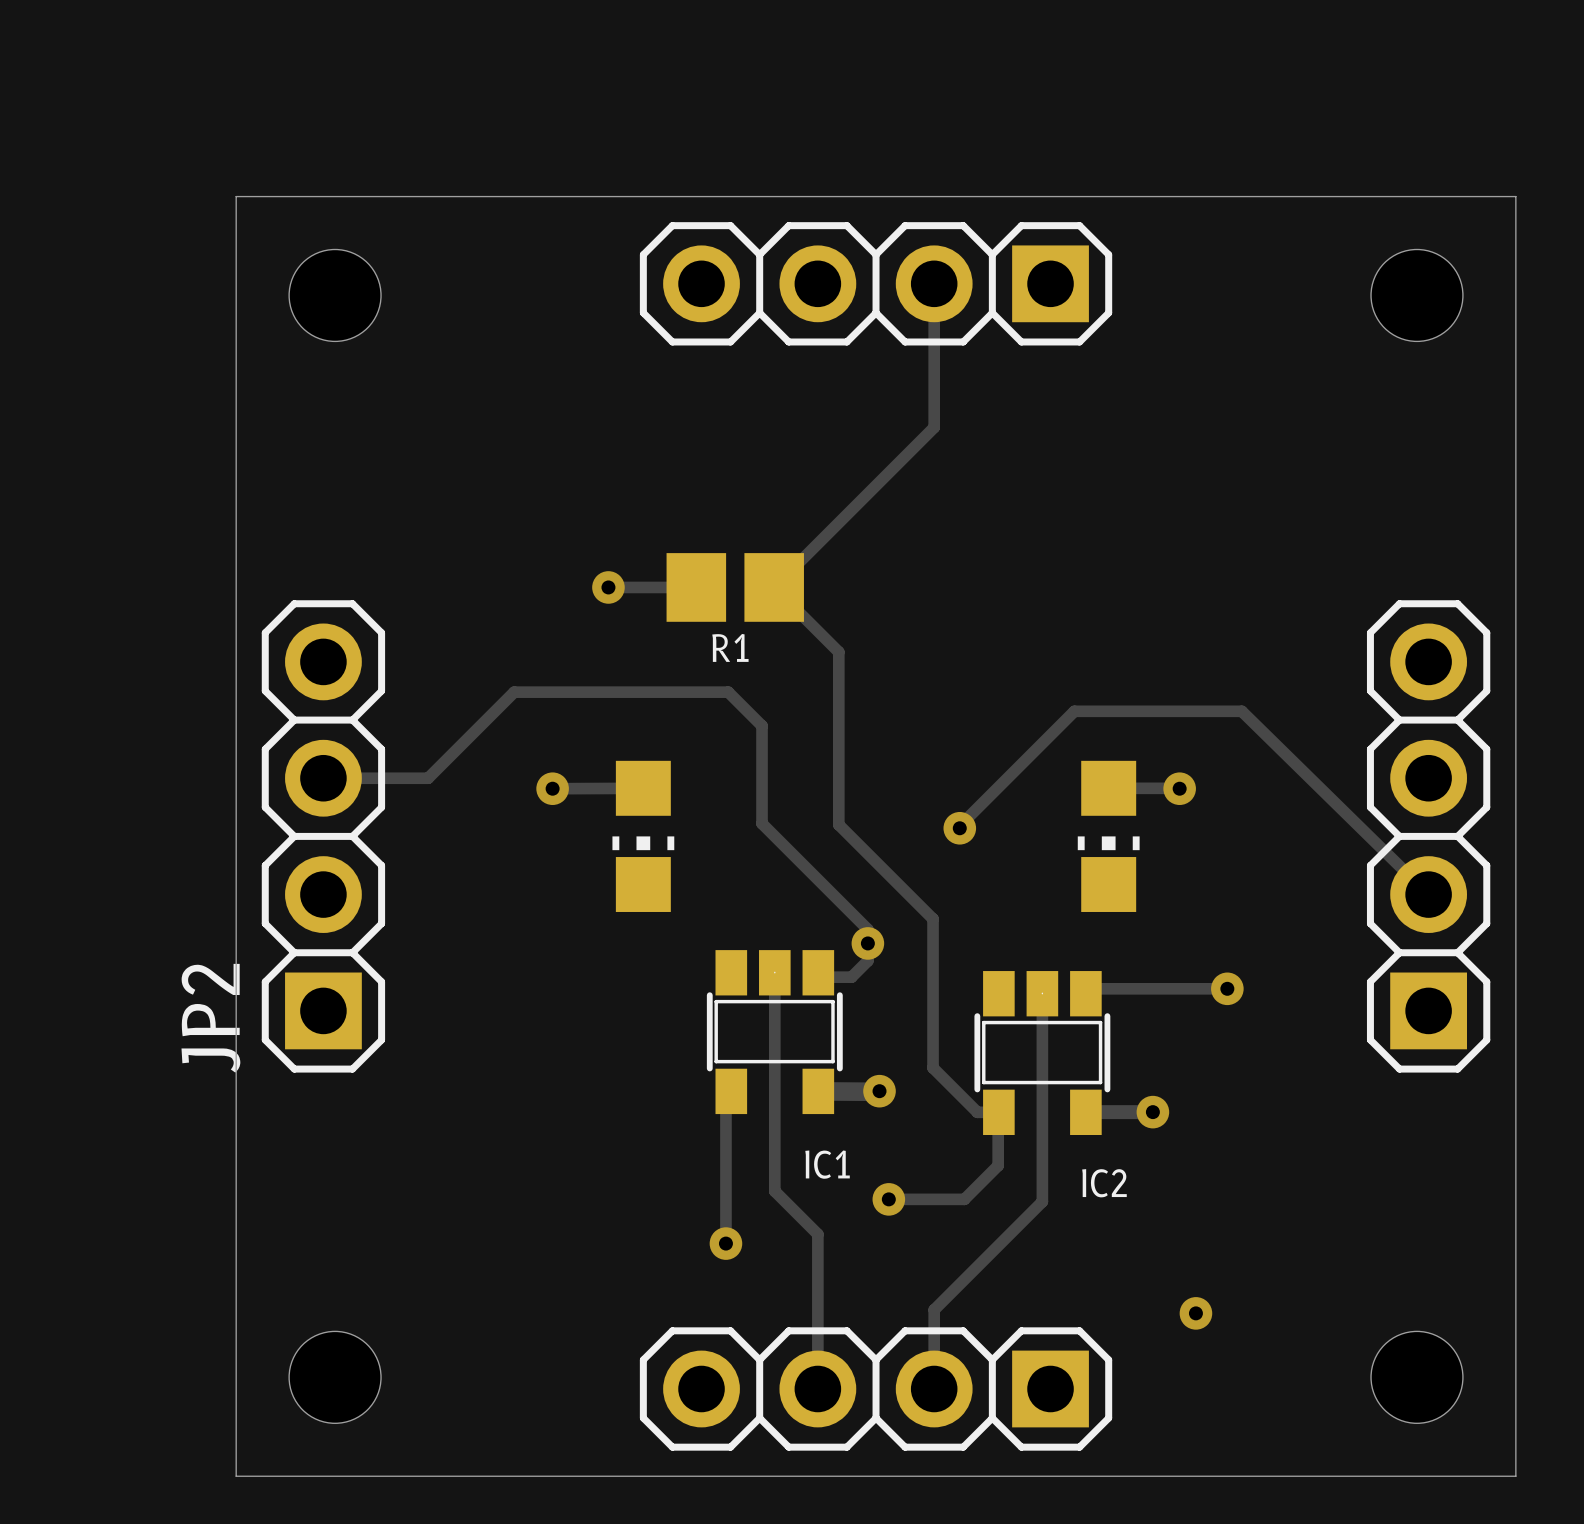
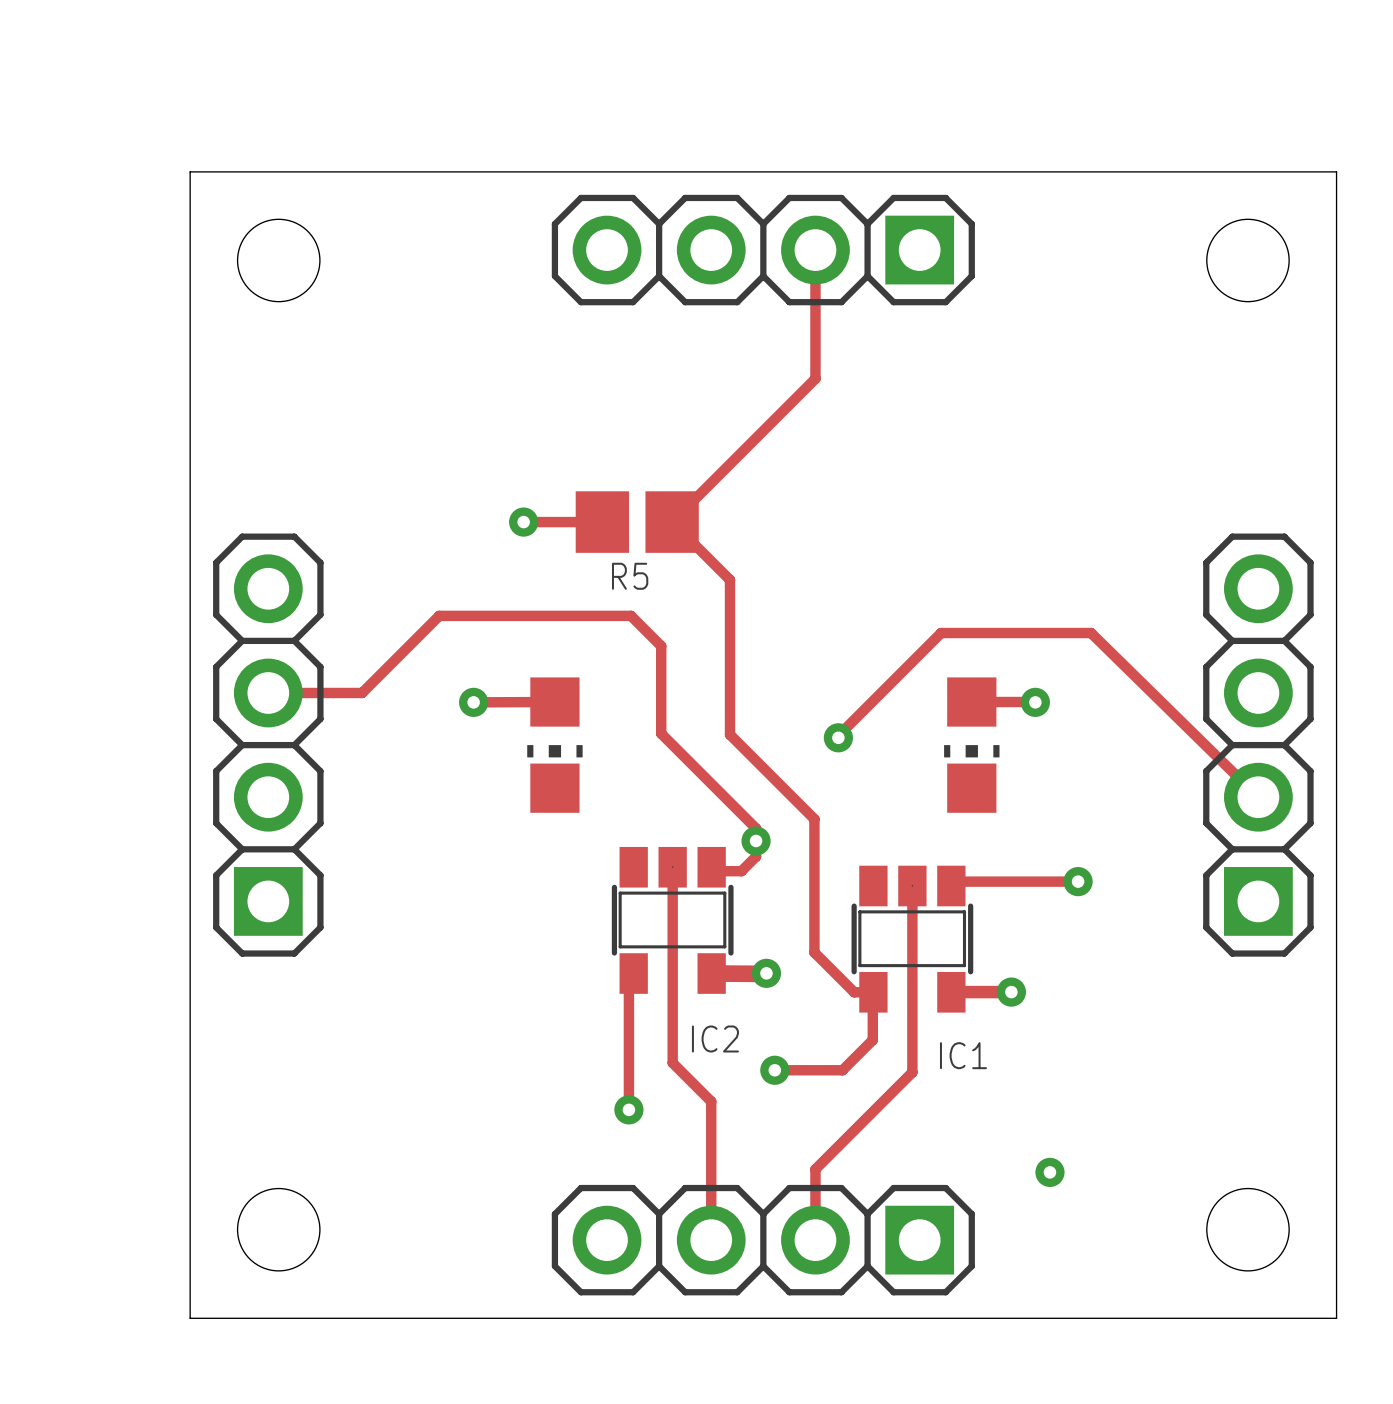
R1 name: R1 (730, 647) -> R5 (630, 576)
JP2 name: JP2 (210, 1018) -> none
IC1 name: IC1 (827, 1164) -> IC2 (715, 1038)
IC2 name: IC2 (1104, 1183) -> IC1 (963, 1055)

